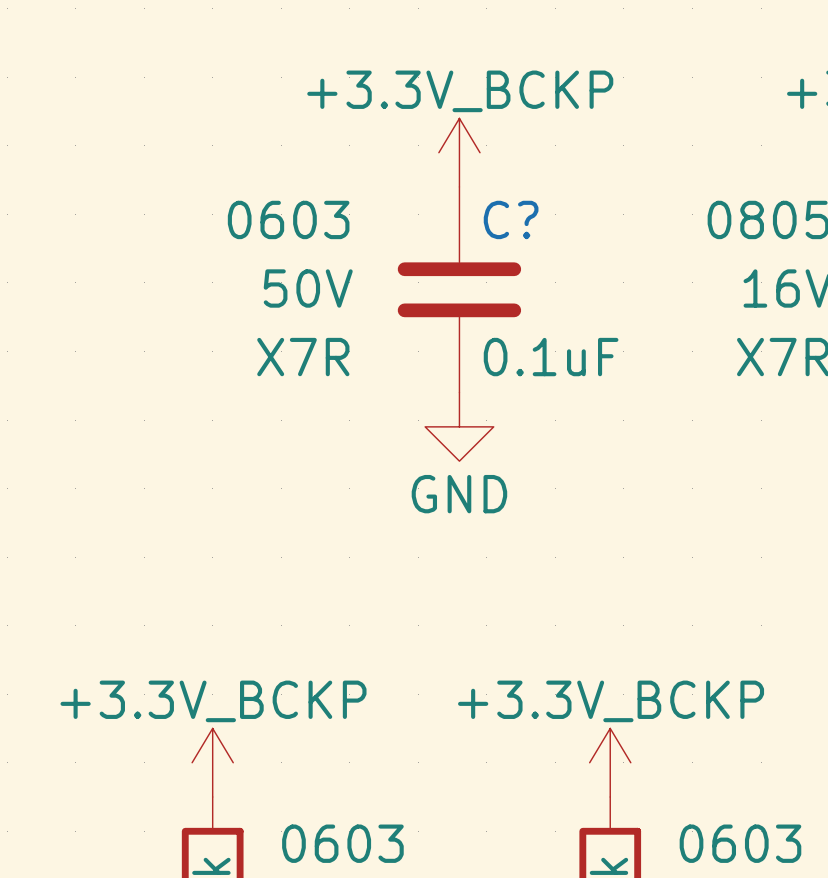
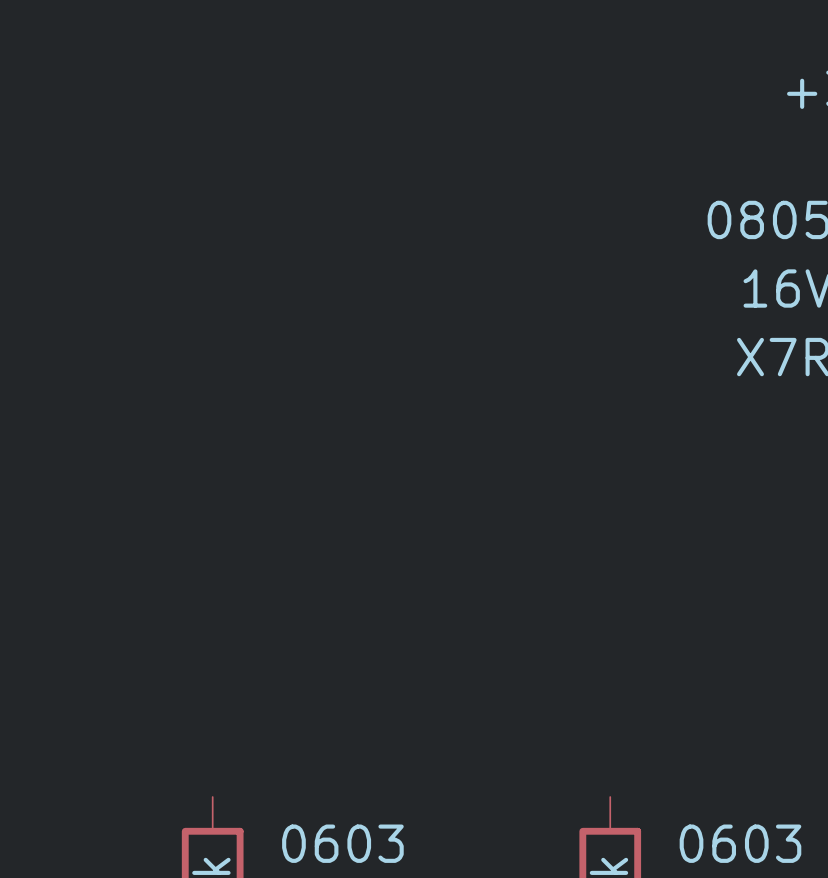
power symbol: +3.3V_BCKP (459, 152) -> none
C?: 0.1uF (459, 289) -> none
power symbol: GND (459, 426) -> none
power symbol: +3.3V_BCKP (212, 762) -> none
power symbol: +3.3V_BCKP (610, 762) -> none

